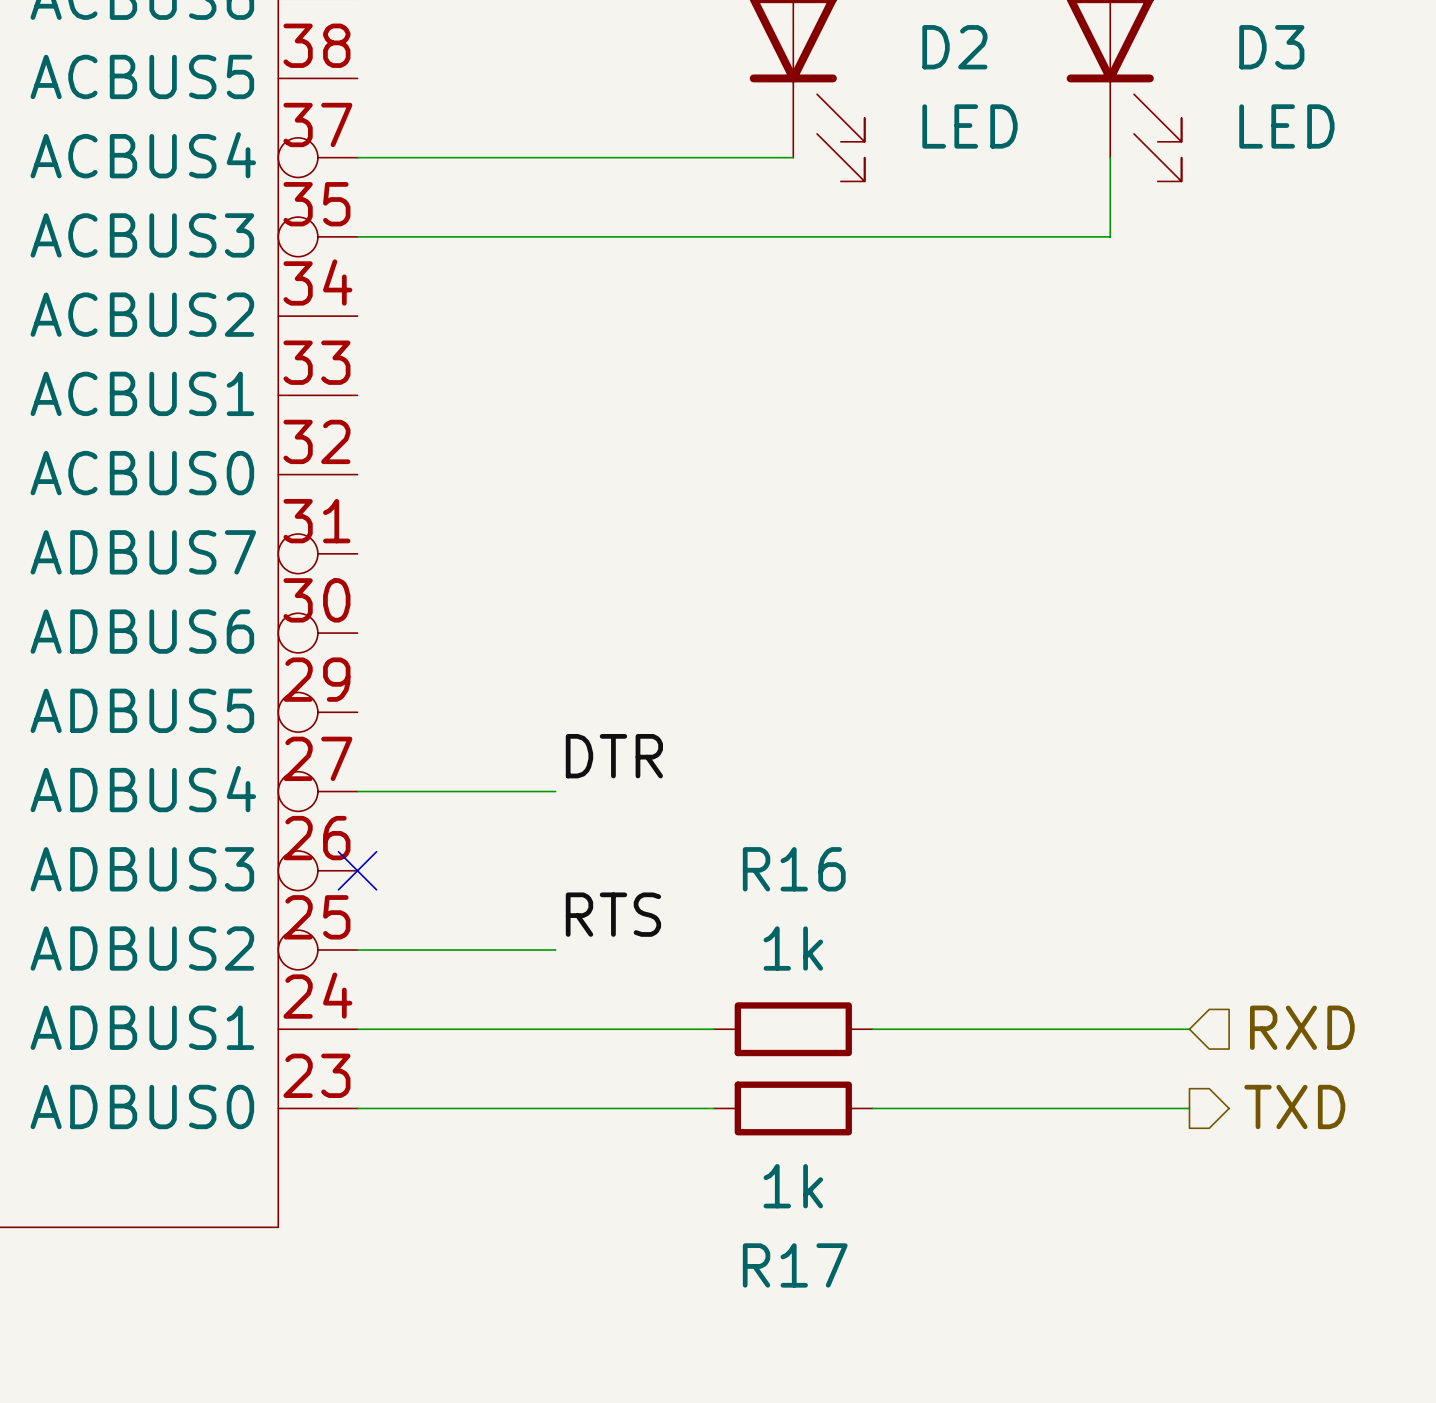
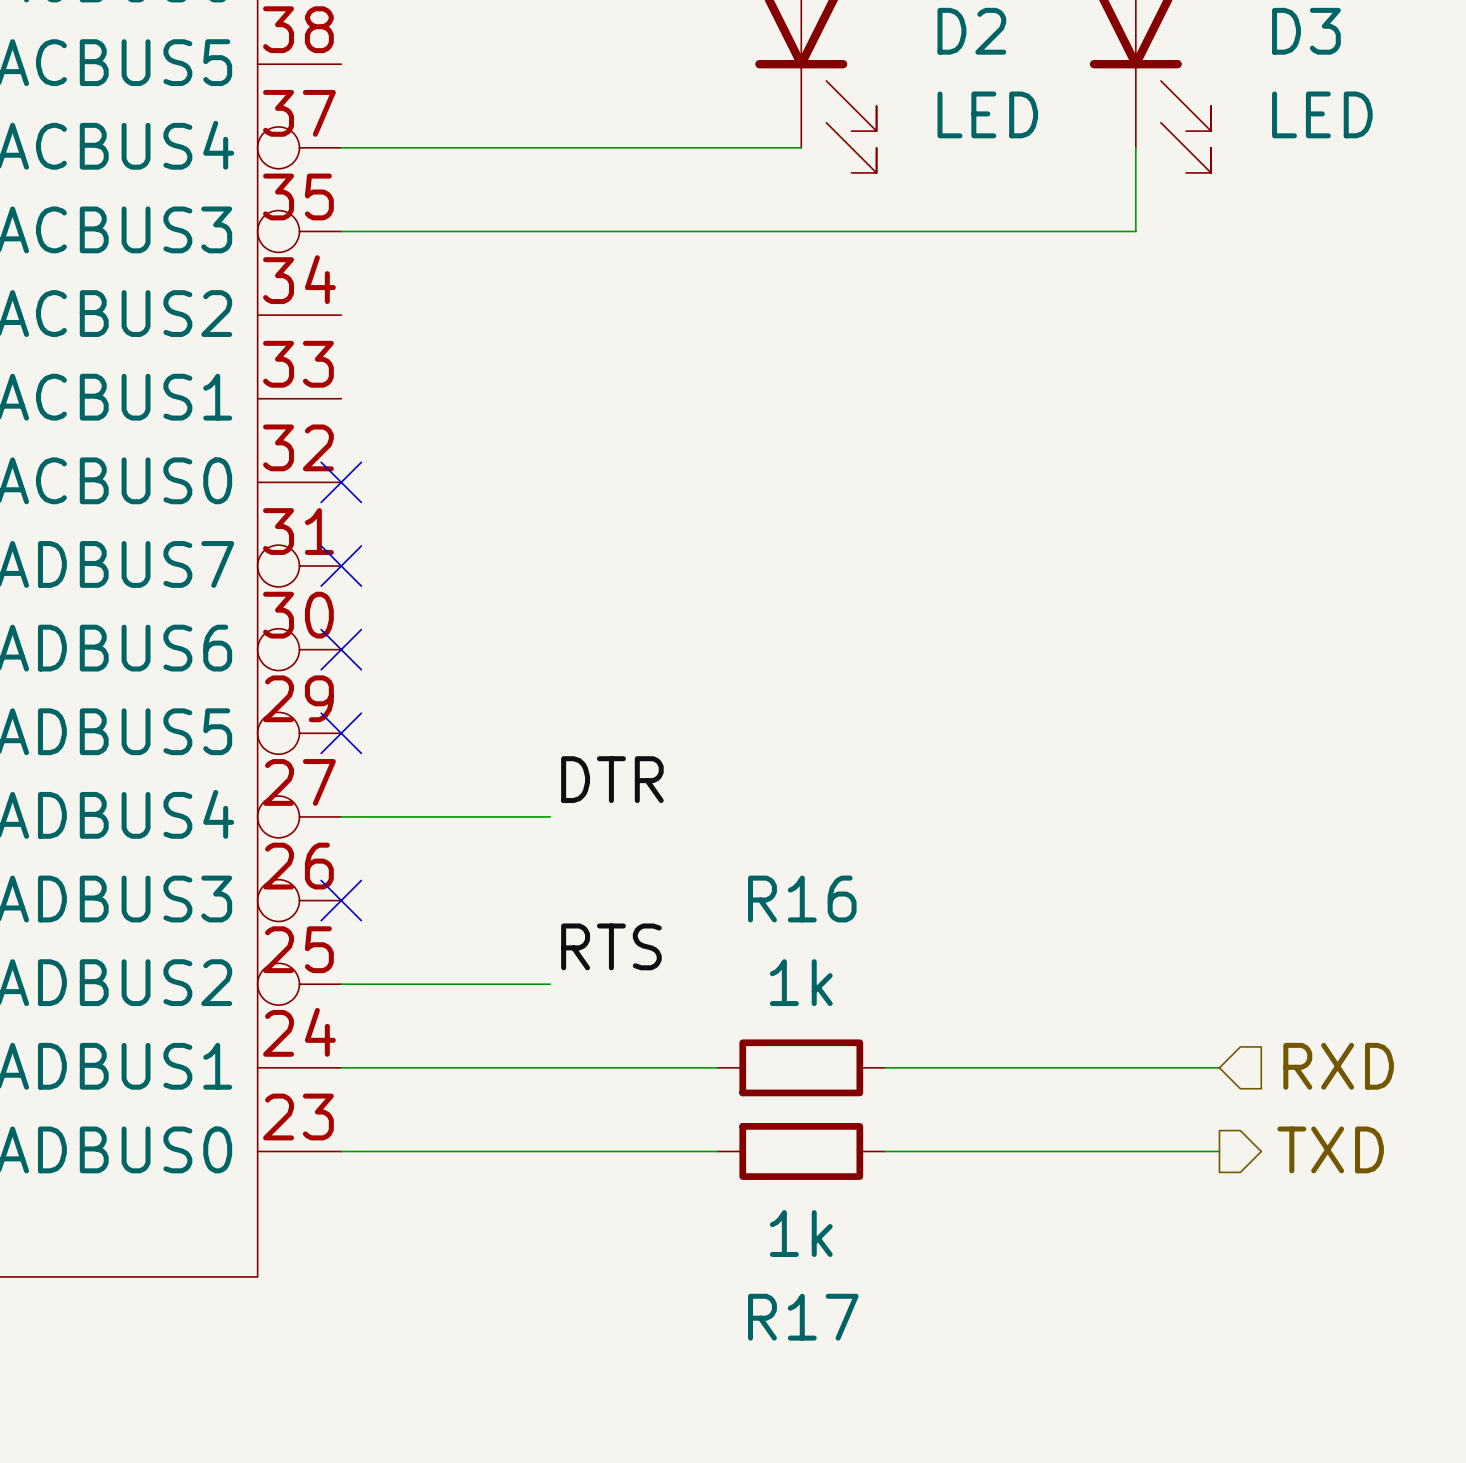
no-connect mark: none -> (341, 482)
no-connect mark: none -> (341, 566)
no-connect mark: none -> (341, 649)
no-connect mark: none -> (341, 733)

